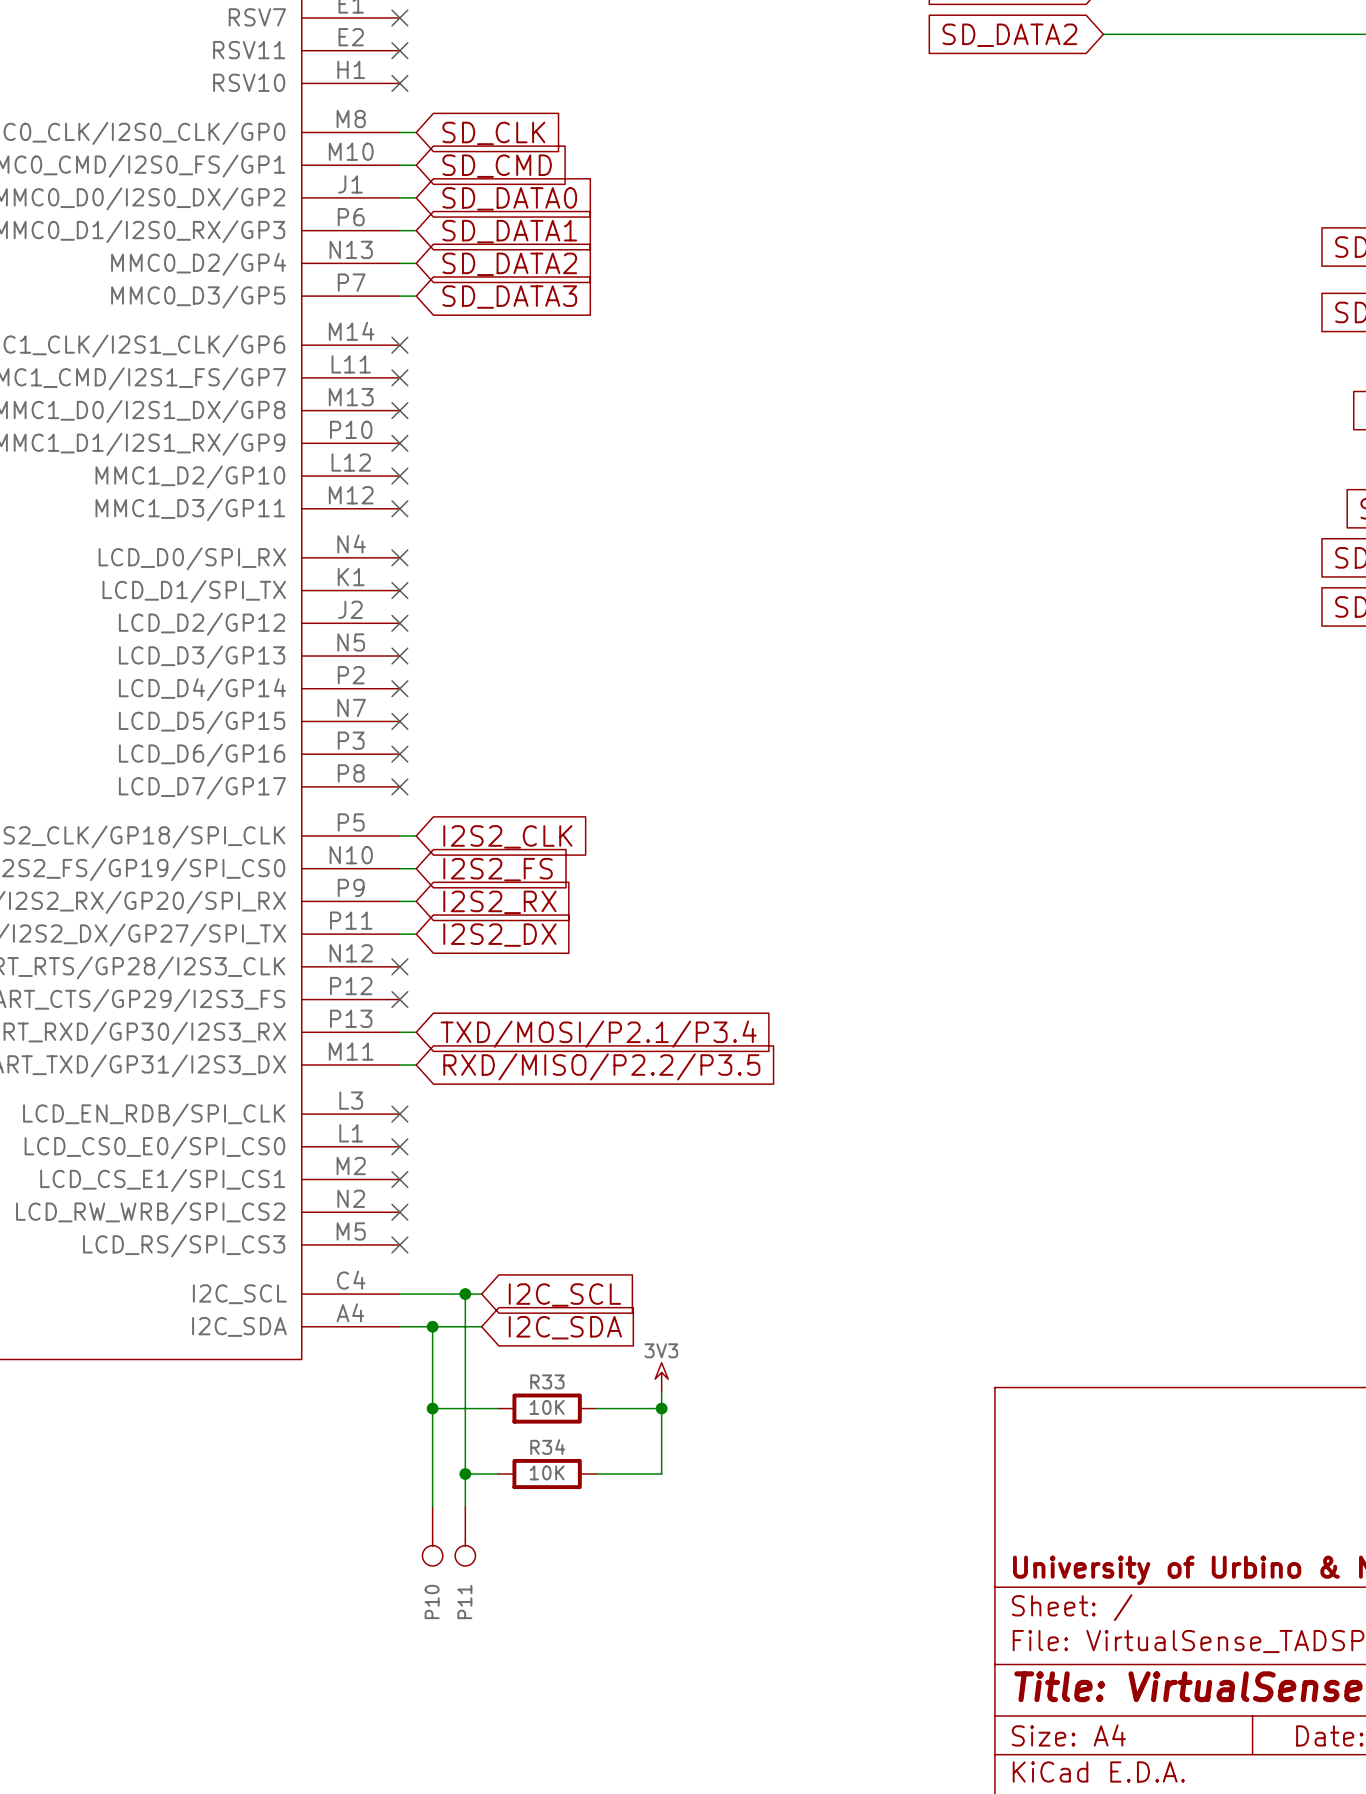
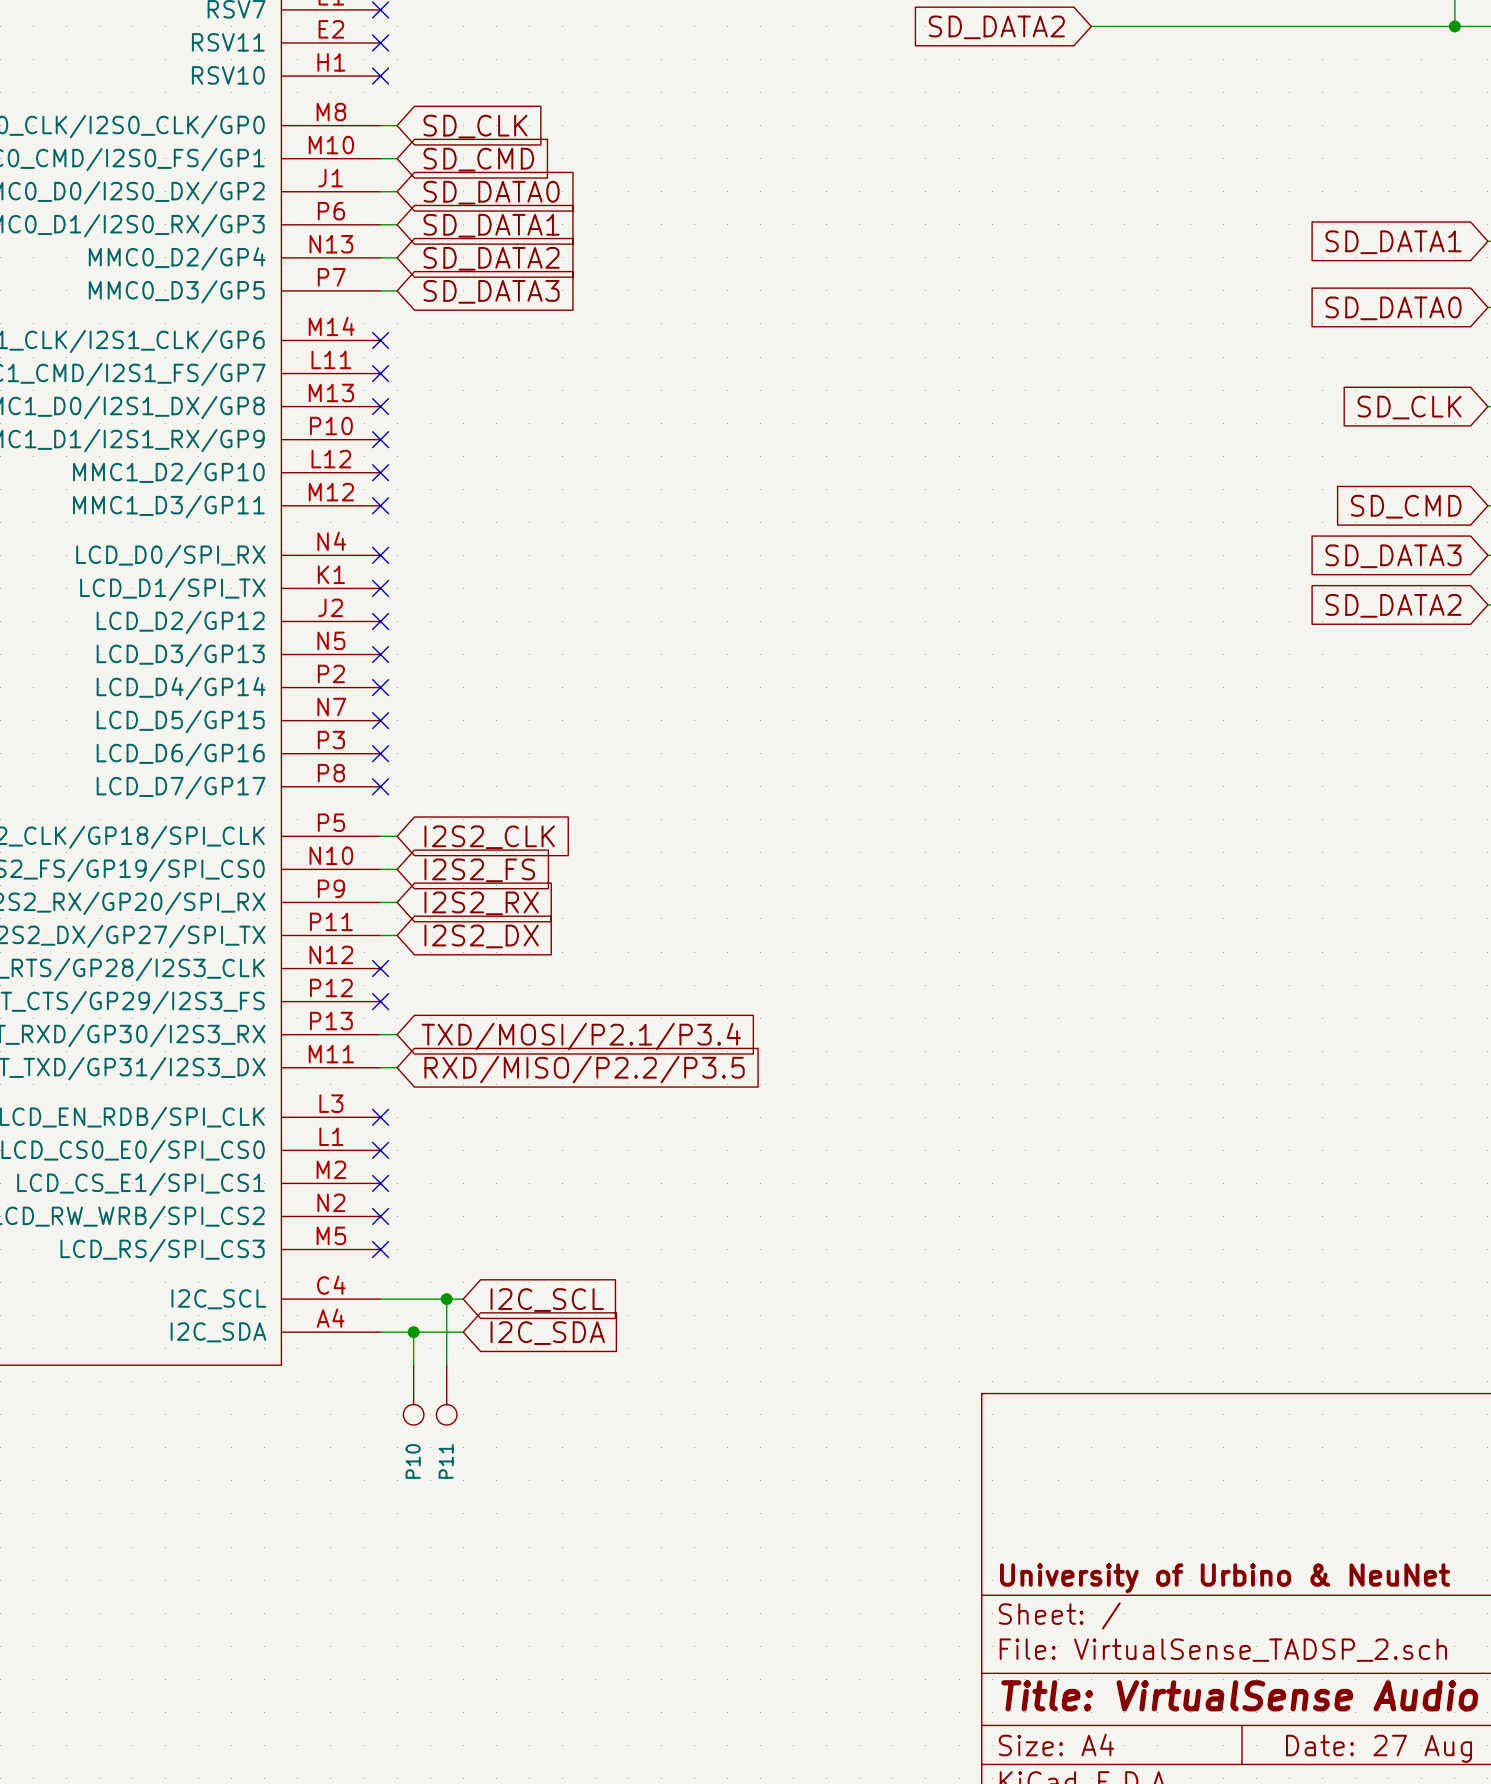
wire: (432, 1359) (432, 1506) -> none
wire: (465, 1359) (465, 1506) -> none
power symbol: 3V3 (661, 1377) -> none
wire: (661, 1392) (661, 1474) (596, 1474) -> none
wire: (432, 1408) (498, 1408) -> none
junction: (432, 1408) -> none
R33: 10K (547, 1408) -> none
wire: (596, 1408) (661, 1408) -> none
junction: (661, 1408) -> none
wire: (465, 1474) (498, 1474) -> none
junction: (465, 1474) -> none
R34: 10K (547, 1474) -> none
P10 position: (432, 1536) -> (413, 1395)
P11 position: (465, 1536) -> (446, 1395)

